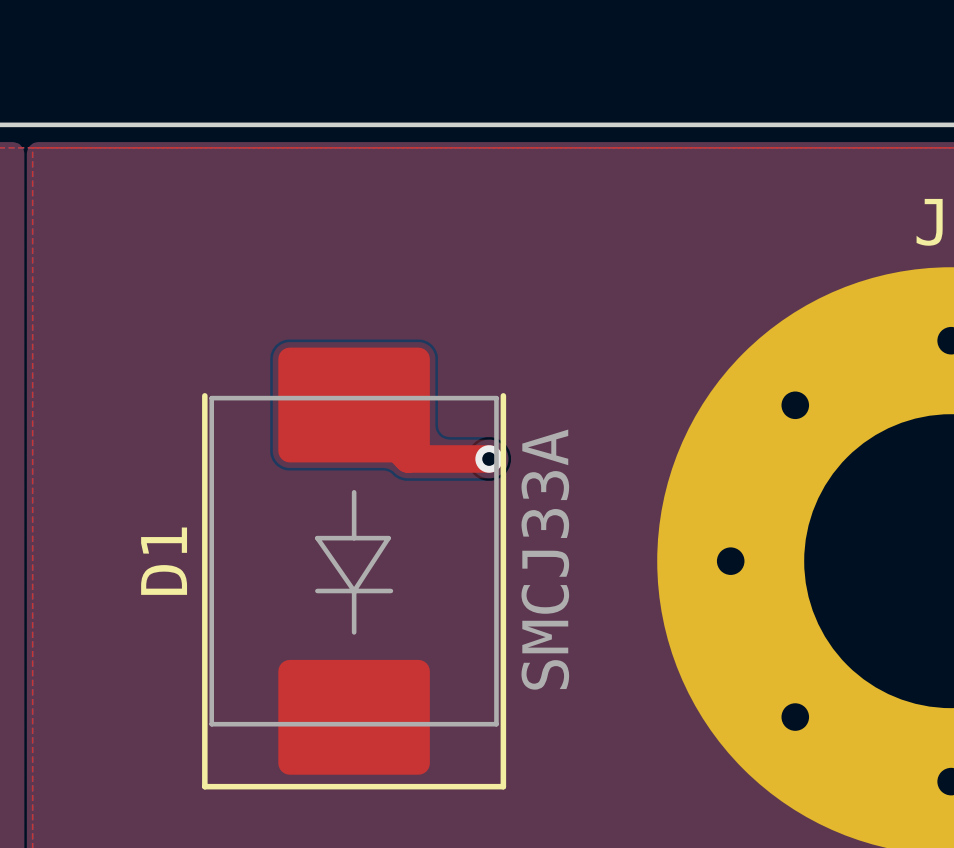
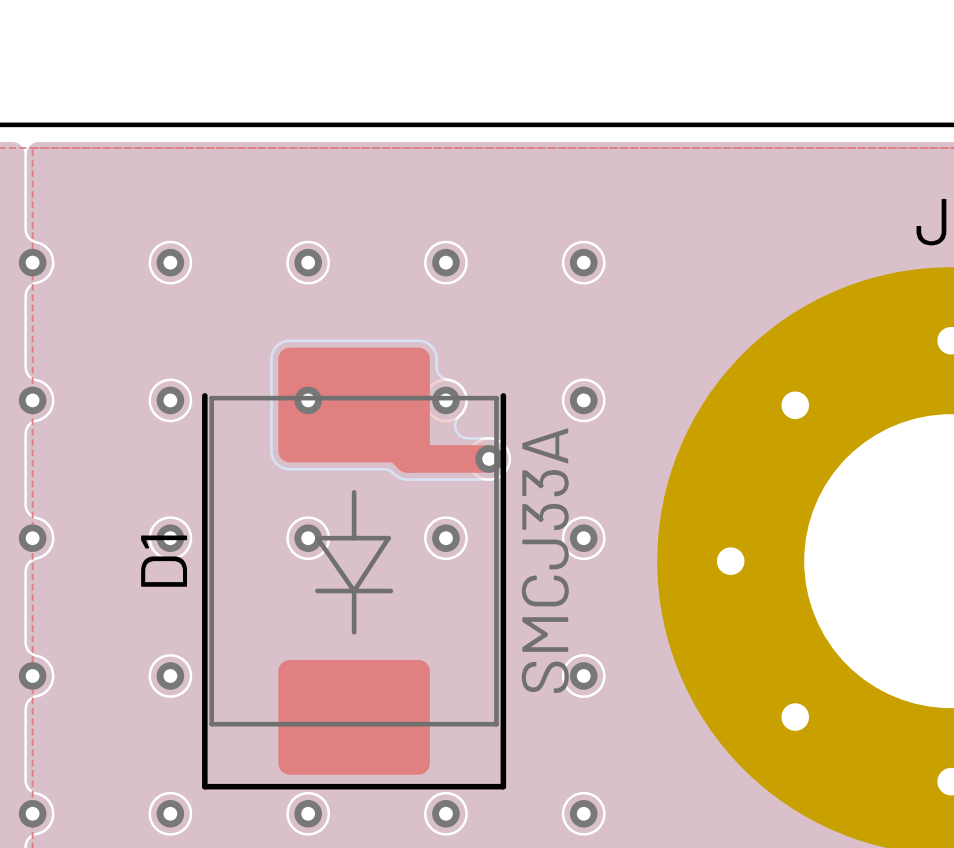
via: none -> (32, 262)
via: none -> (170, 262)
via: none -> (308, 262)
via: none -> (445, 262)
via: none -> (583, 262)
via: none -> (32, 400)
via: none -> (170, 400)
via: none -> (308, 400)
via: none -> (445, 400)
via: none -> (583, 400)
via: none -> (32, 538)
via: none -> (170, 538)
via: none -> (308, 538)
via: none -> (445, 538)
via: none -> (583, 538)
via: none -> (32, 675)
via: none -> (170, 675)
via: none -> (583, 675)
via: none -> (32, 813)
via: none -> (170, 813)
via: none -> (308, 813)
via: none -> (445, 813)
via: none -> (583, 813)

